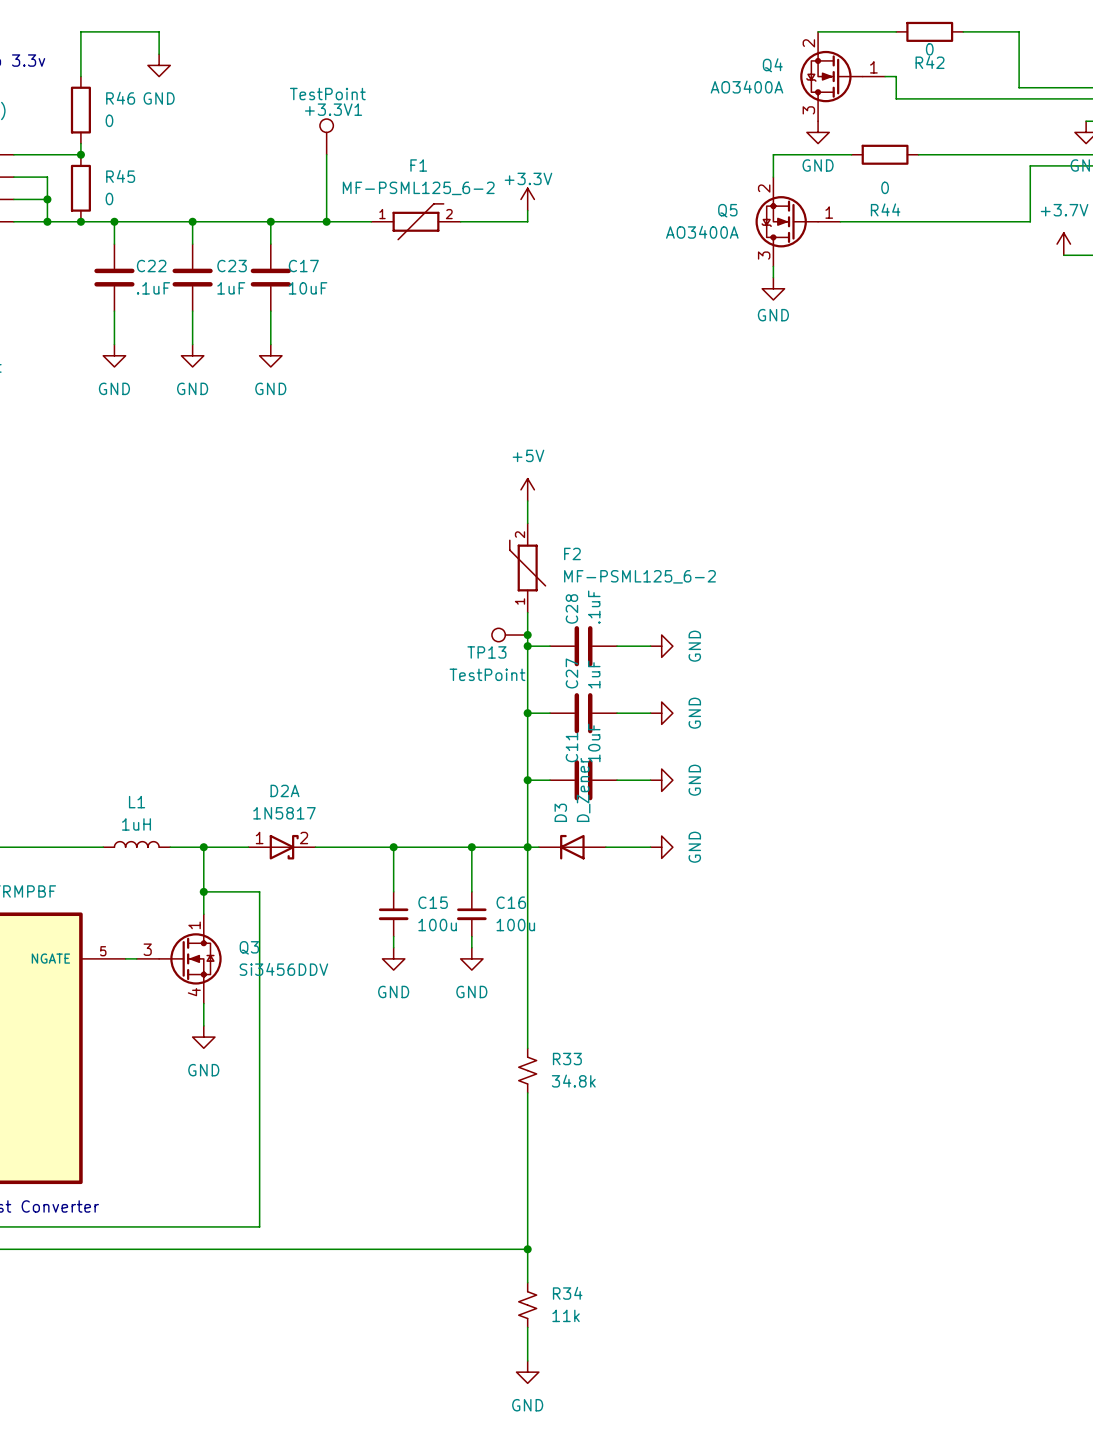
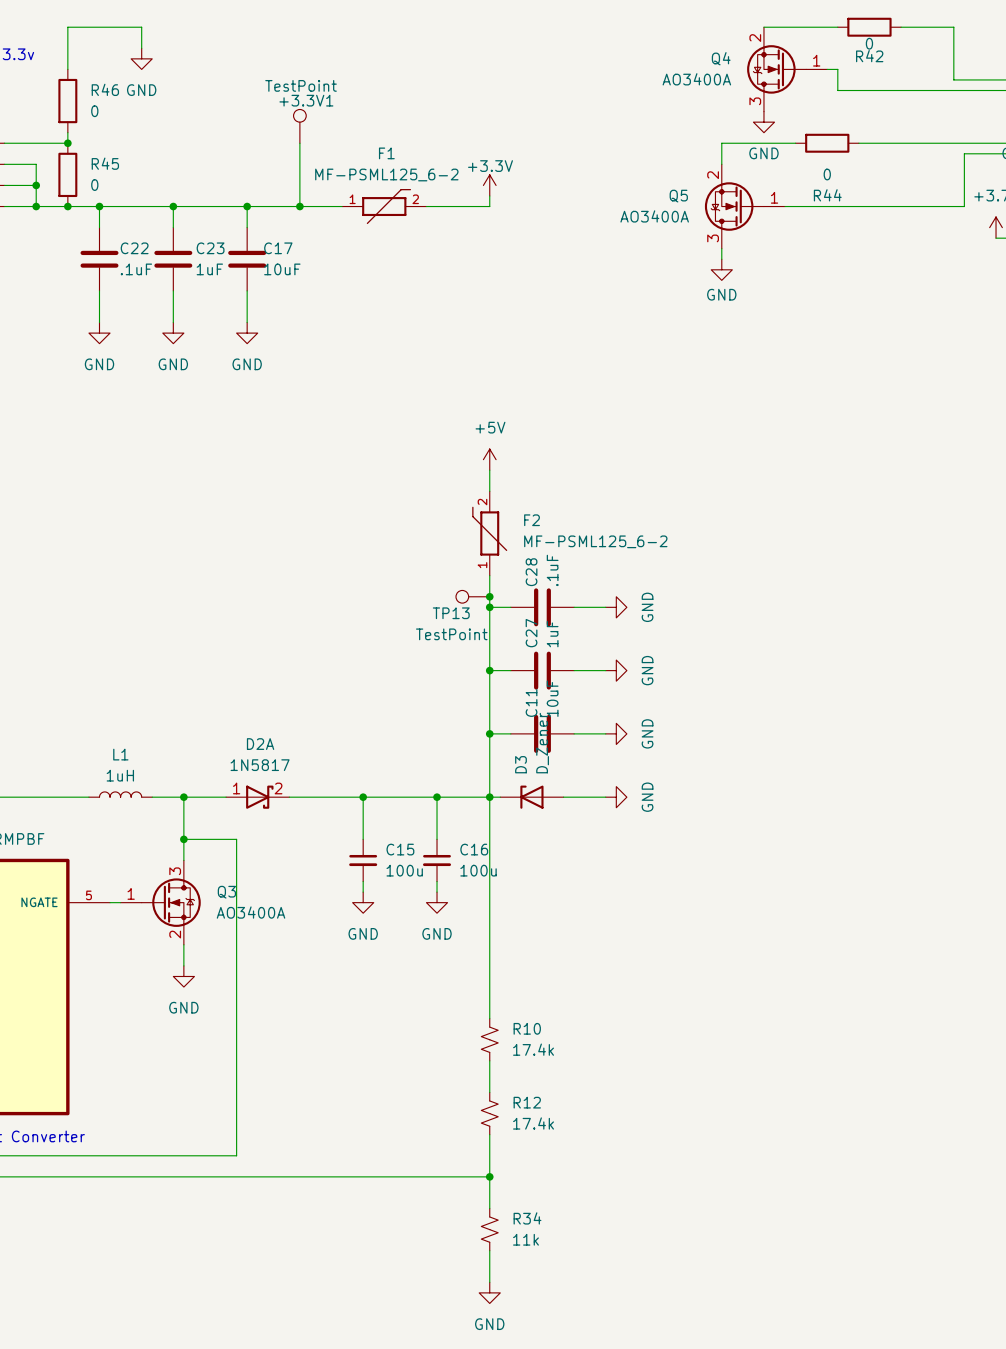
Q3 symbol: [136, 914, 222, 1004] -> [120, 860, 201, 945]
Q3 value: Si3456DDV (283, 969) -> AO3400A (251, 912)
R33: 34.8k (527, 1070) -> none
wire: (527, 1092) (527, 1126) -> (489, 987) (489, 1018)
R10: none -> 17.4k (489, 1039)
R12: none -> 17.4k (489, 1113)

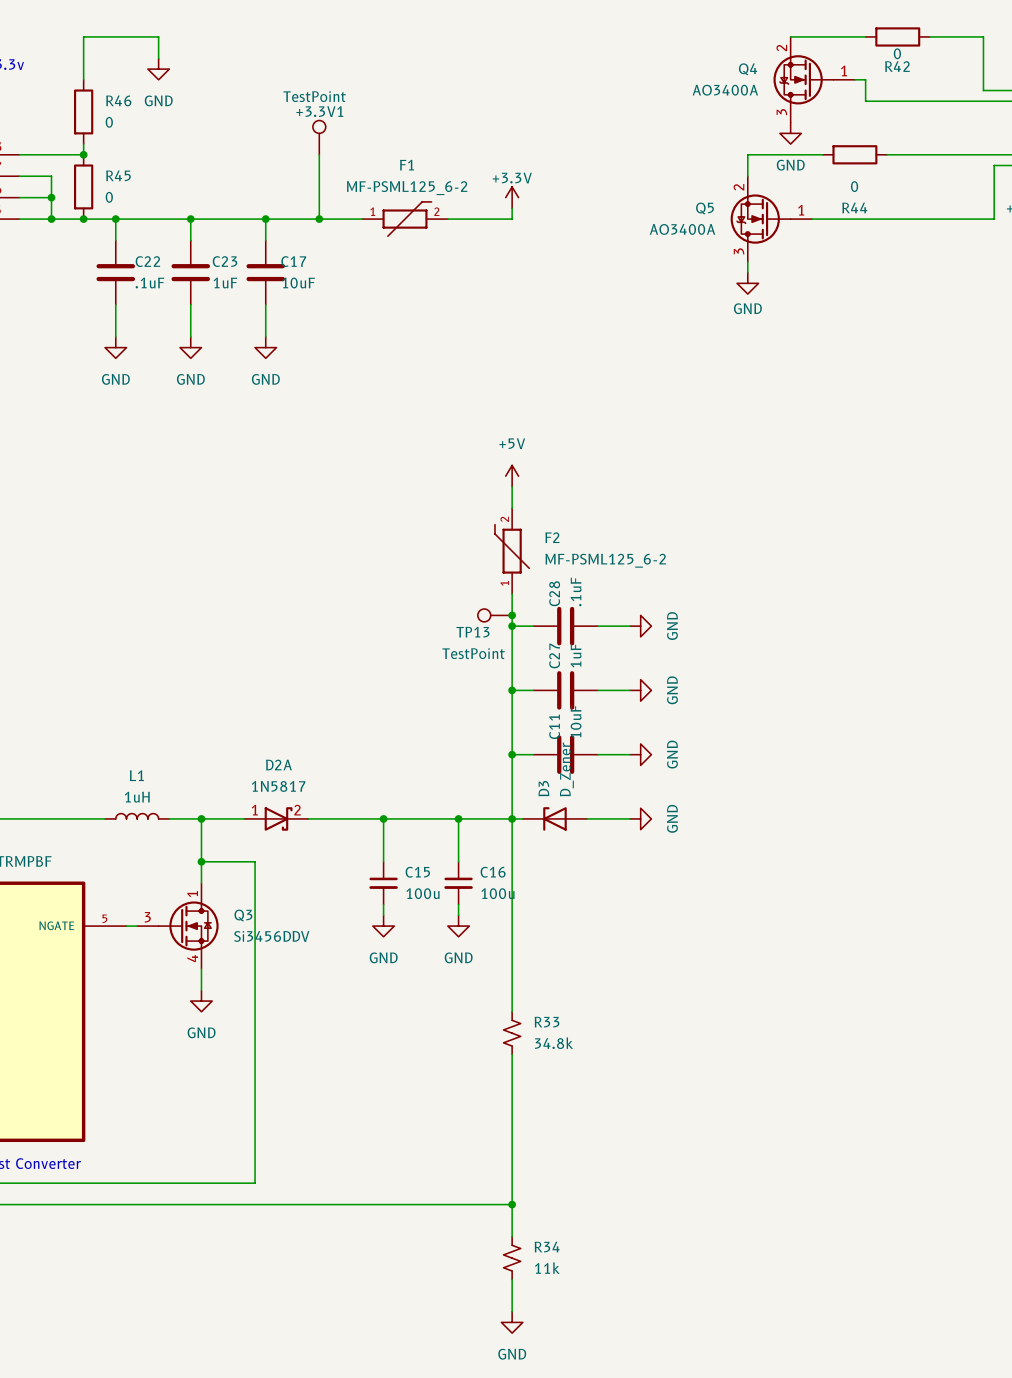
Q3 symbol: [120, 860, 201, 945] -> [137, 883, 219, 969]
Q3 value: AO3400A (251, 912) -> Si3456DDV (271, 936)
wire: (489, 987) (489, 1018) -> (512, 1054) (512, 1086)
R33: none -> 34.8k (512, 1033)
R10: 17.4k (489, 1039) -> none
R12: 17.4k (489, 1113) -> none

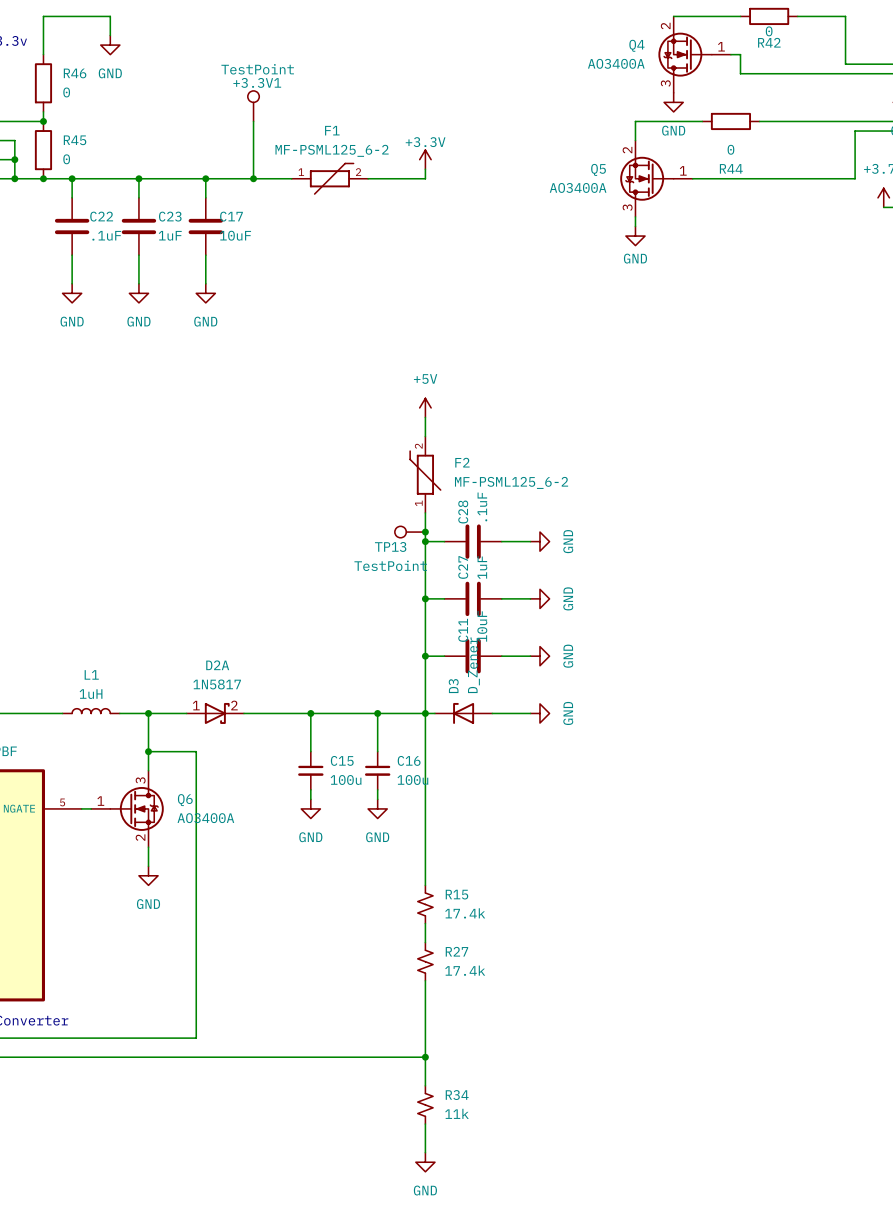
Q3: Si3456DDV (177, 926) -> none
Q6: none -> AO3400A (127, 808)
R33 name: R33 (546, 1022) -> R15 (456, 894)
R33 value: 34.8k (553, 1043) -> 17.4k (465, 913)
R27: none -> 17.4k (425, 961)

